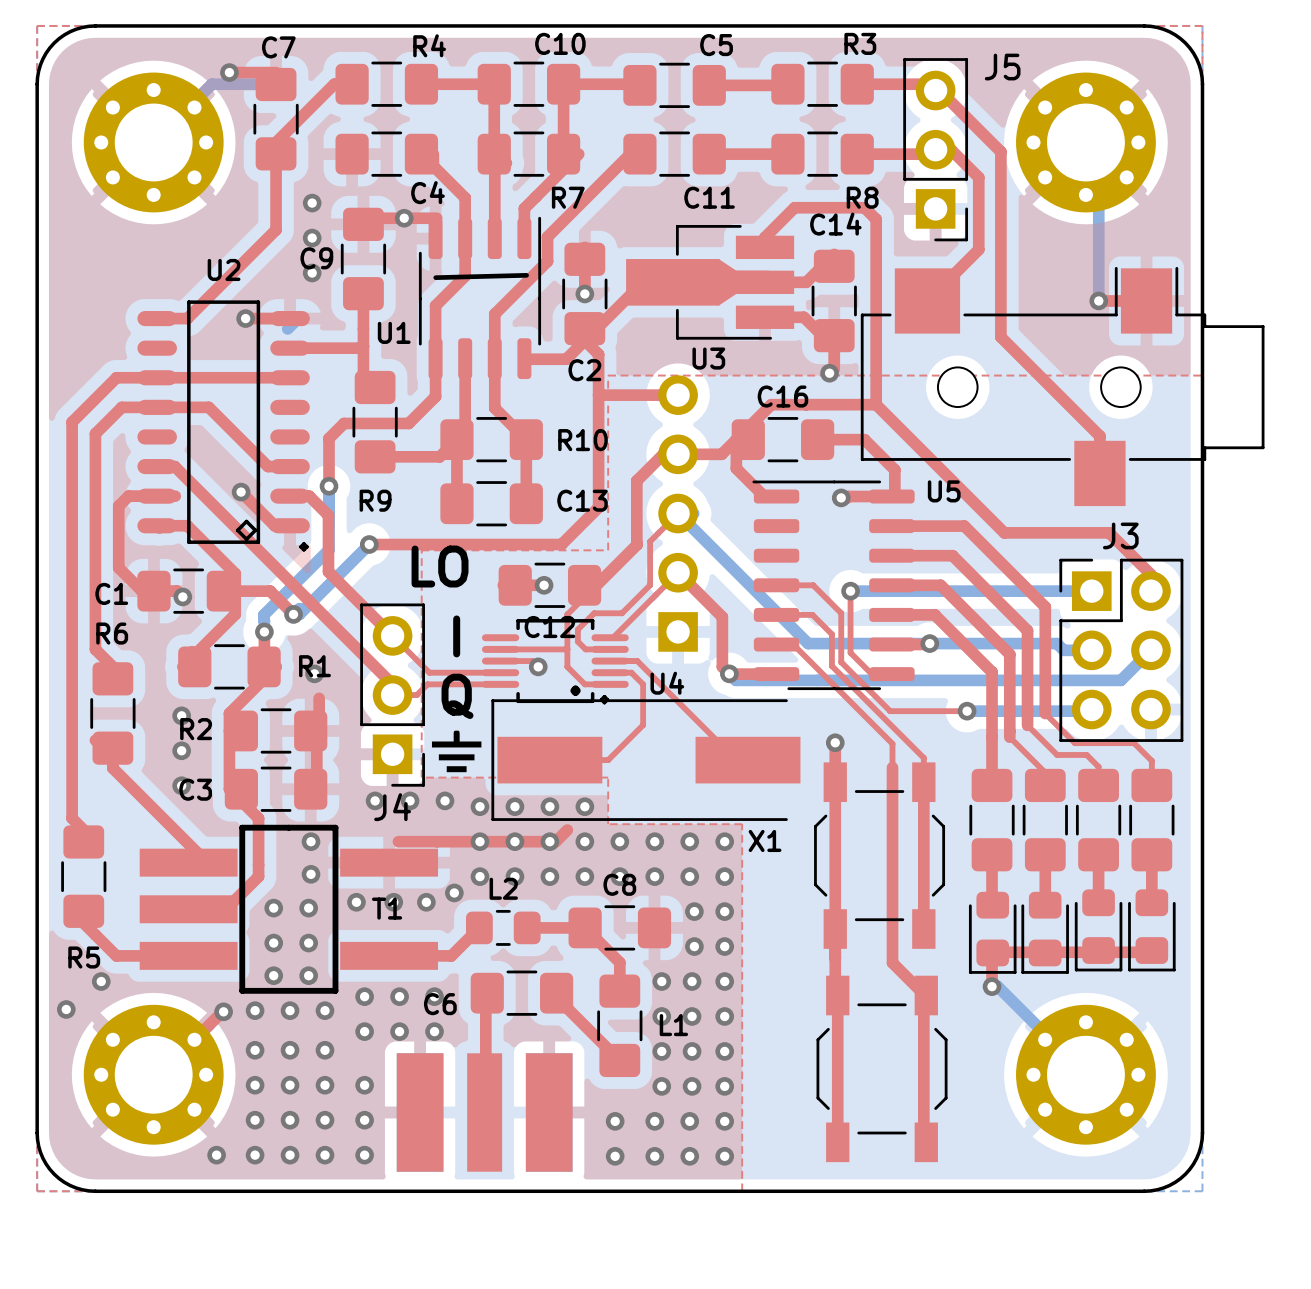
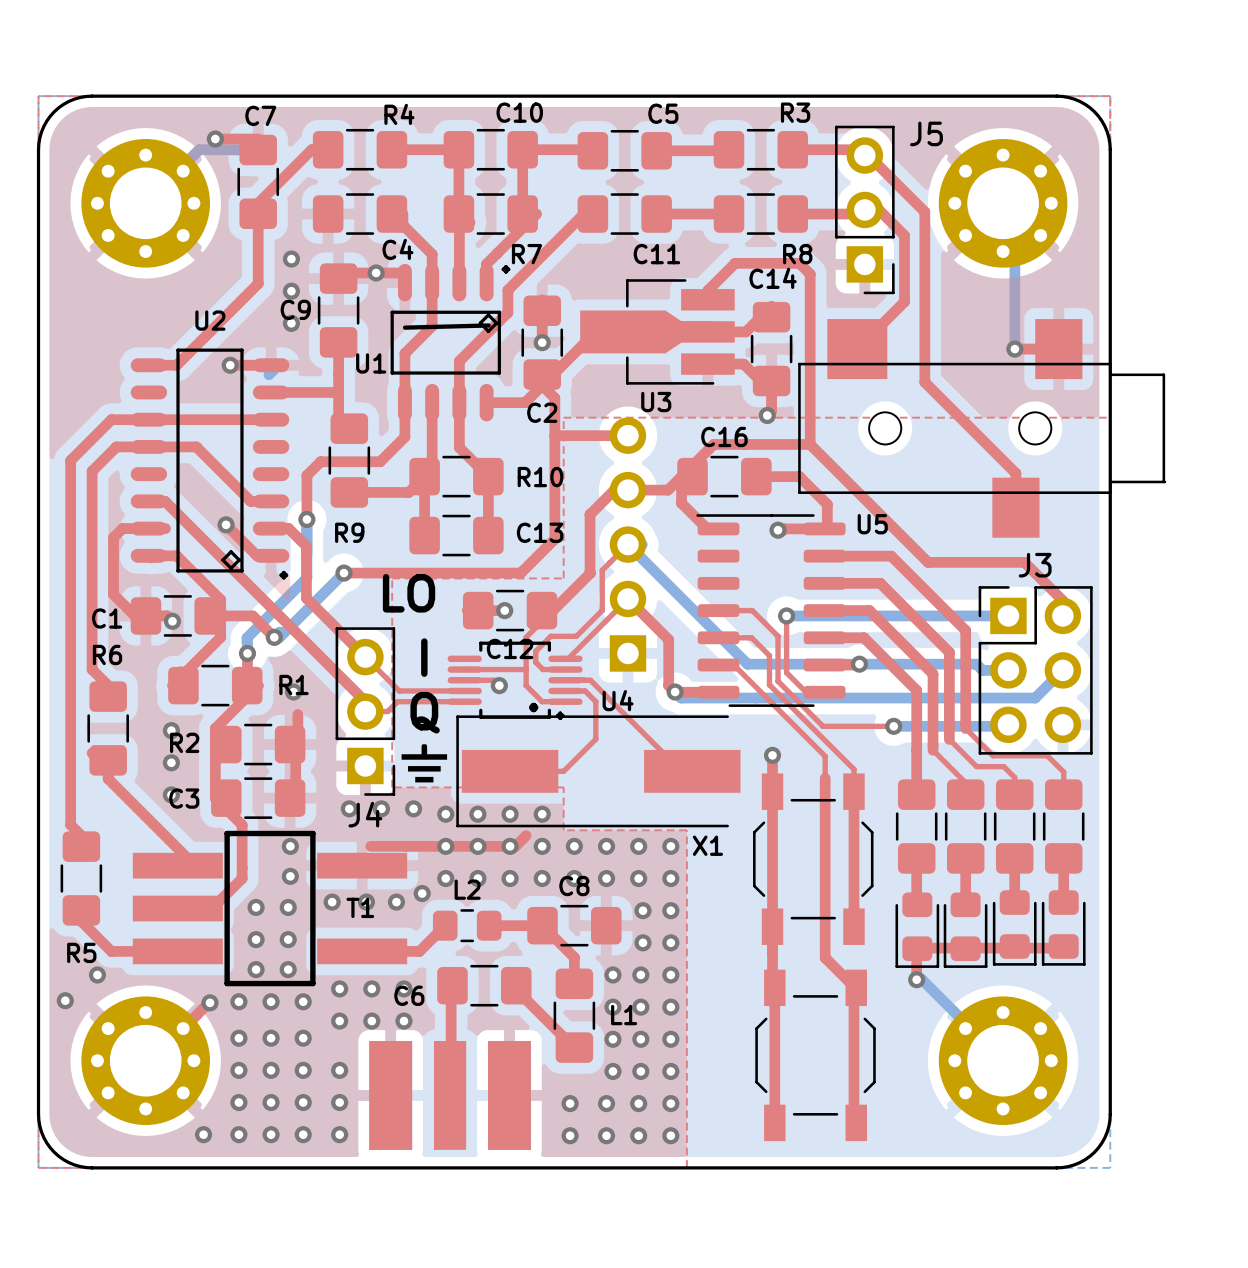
U1 footprint: [418, 216, 542, 380] -> [390, 263, 511, 422]
part footprint: [860, 266, 1265, 507] -> [798, 319, 1167, 538]

